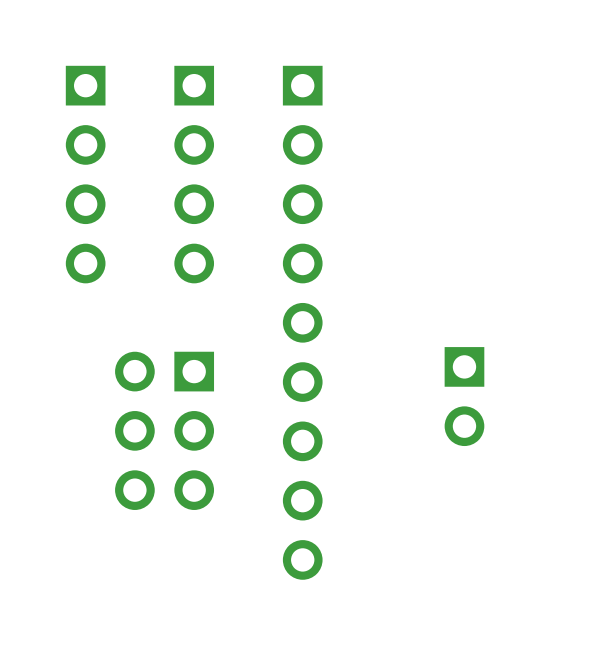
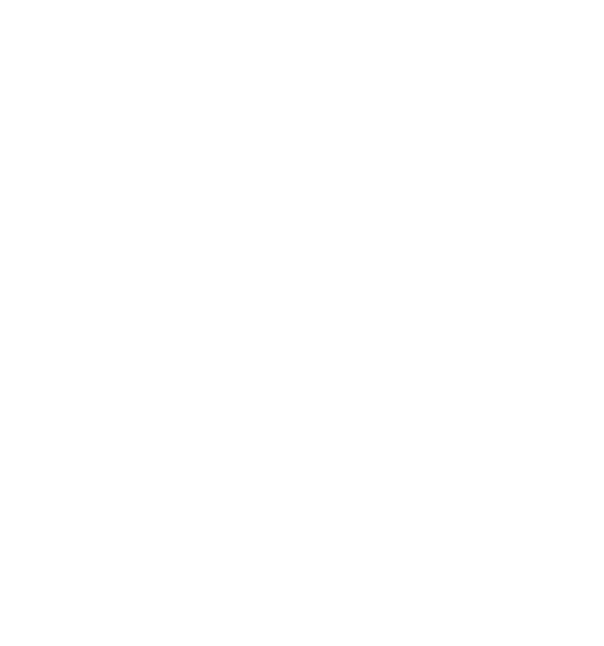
part: (85, 174) -> none
part: (194, 174) -> none
part: (302, 322) -> none
part: (464, 396) -> none
part: (164, 430) -> none

